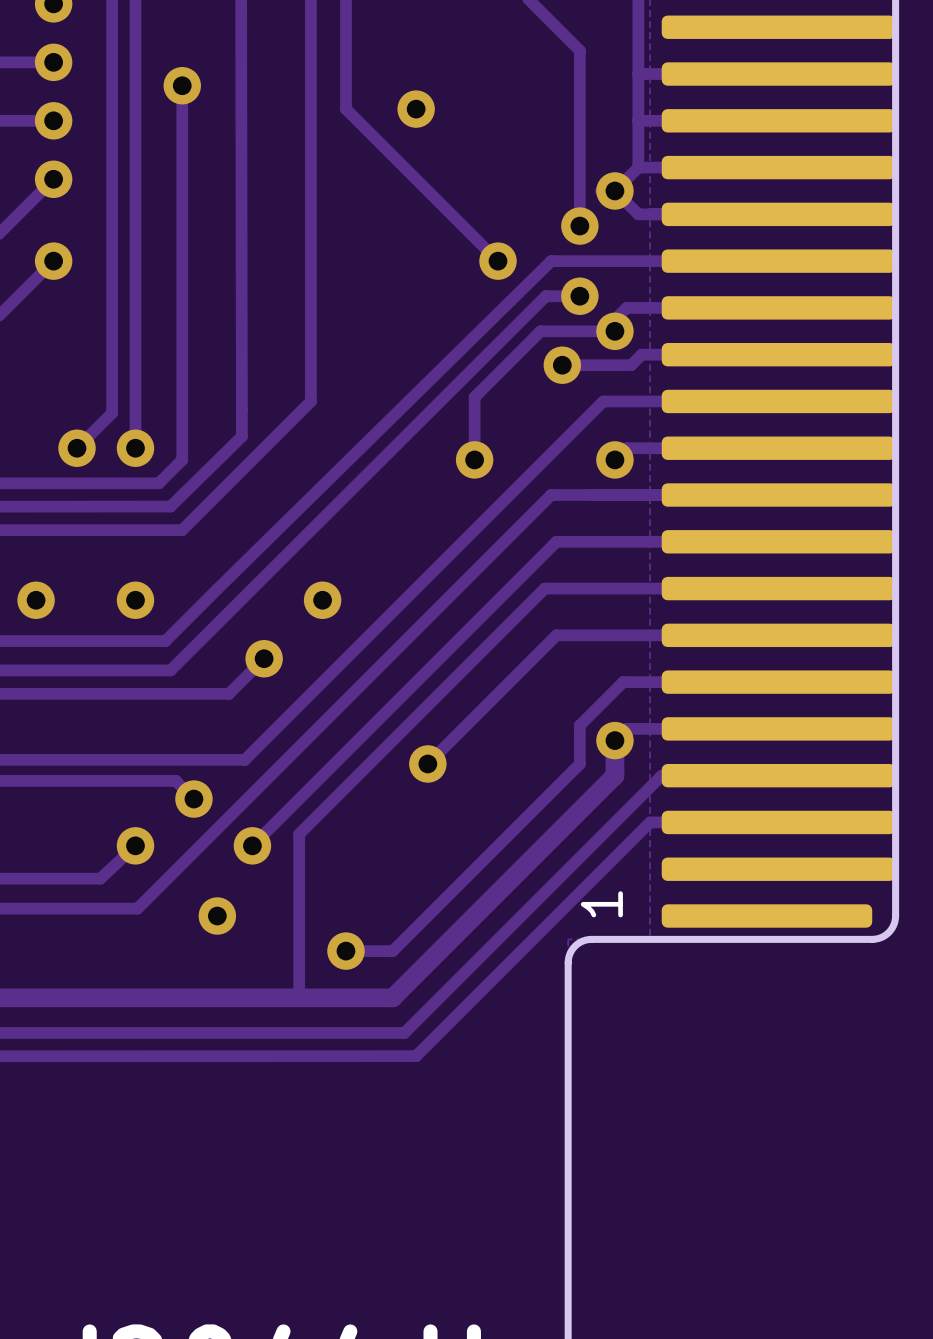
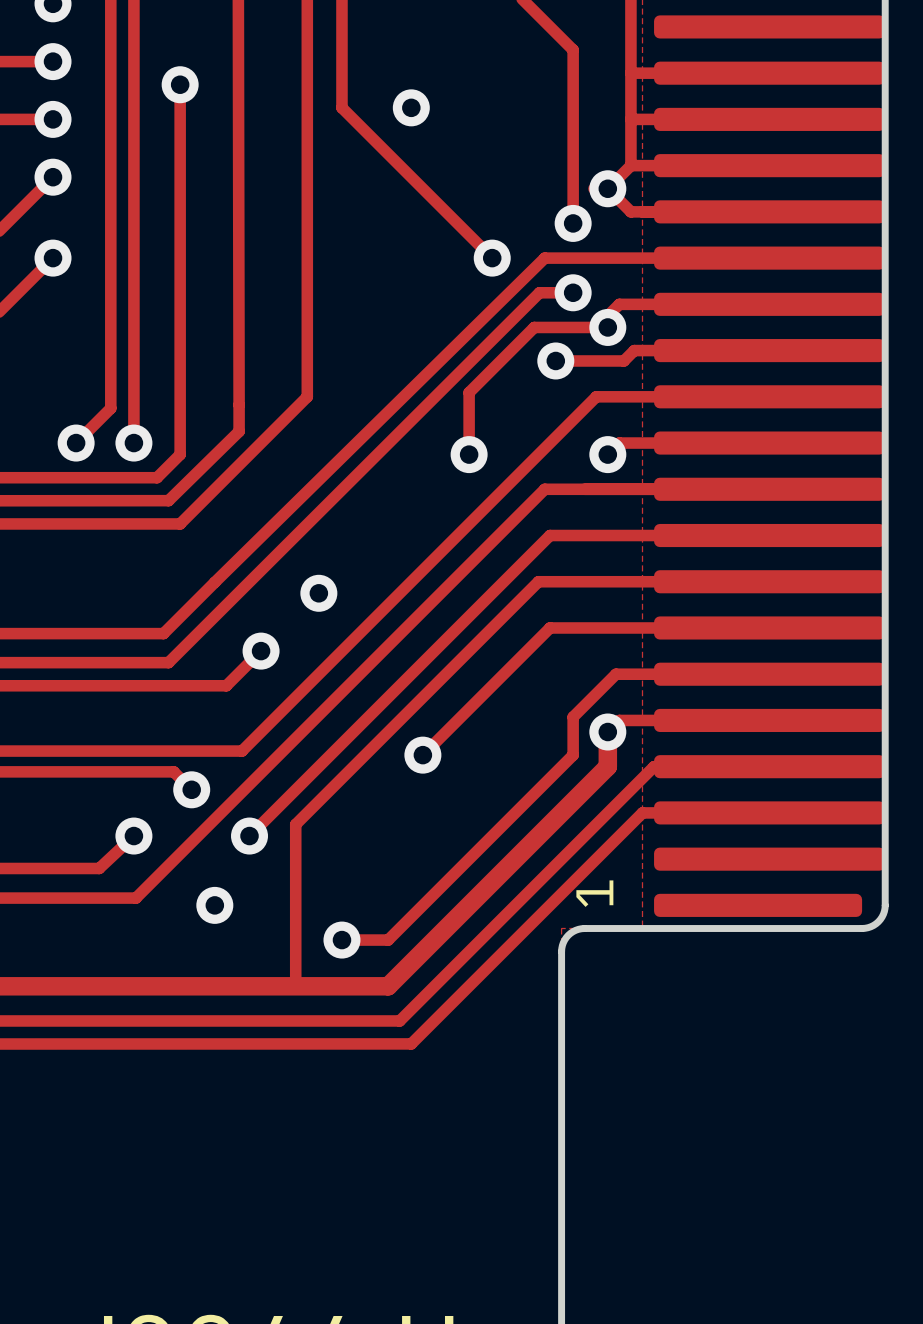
via: (36, 600) -> none
via: (135, 600) -> none

